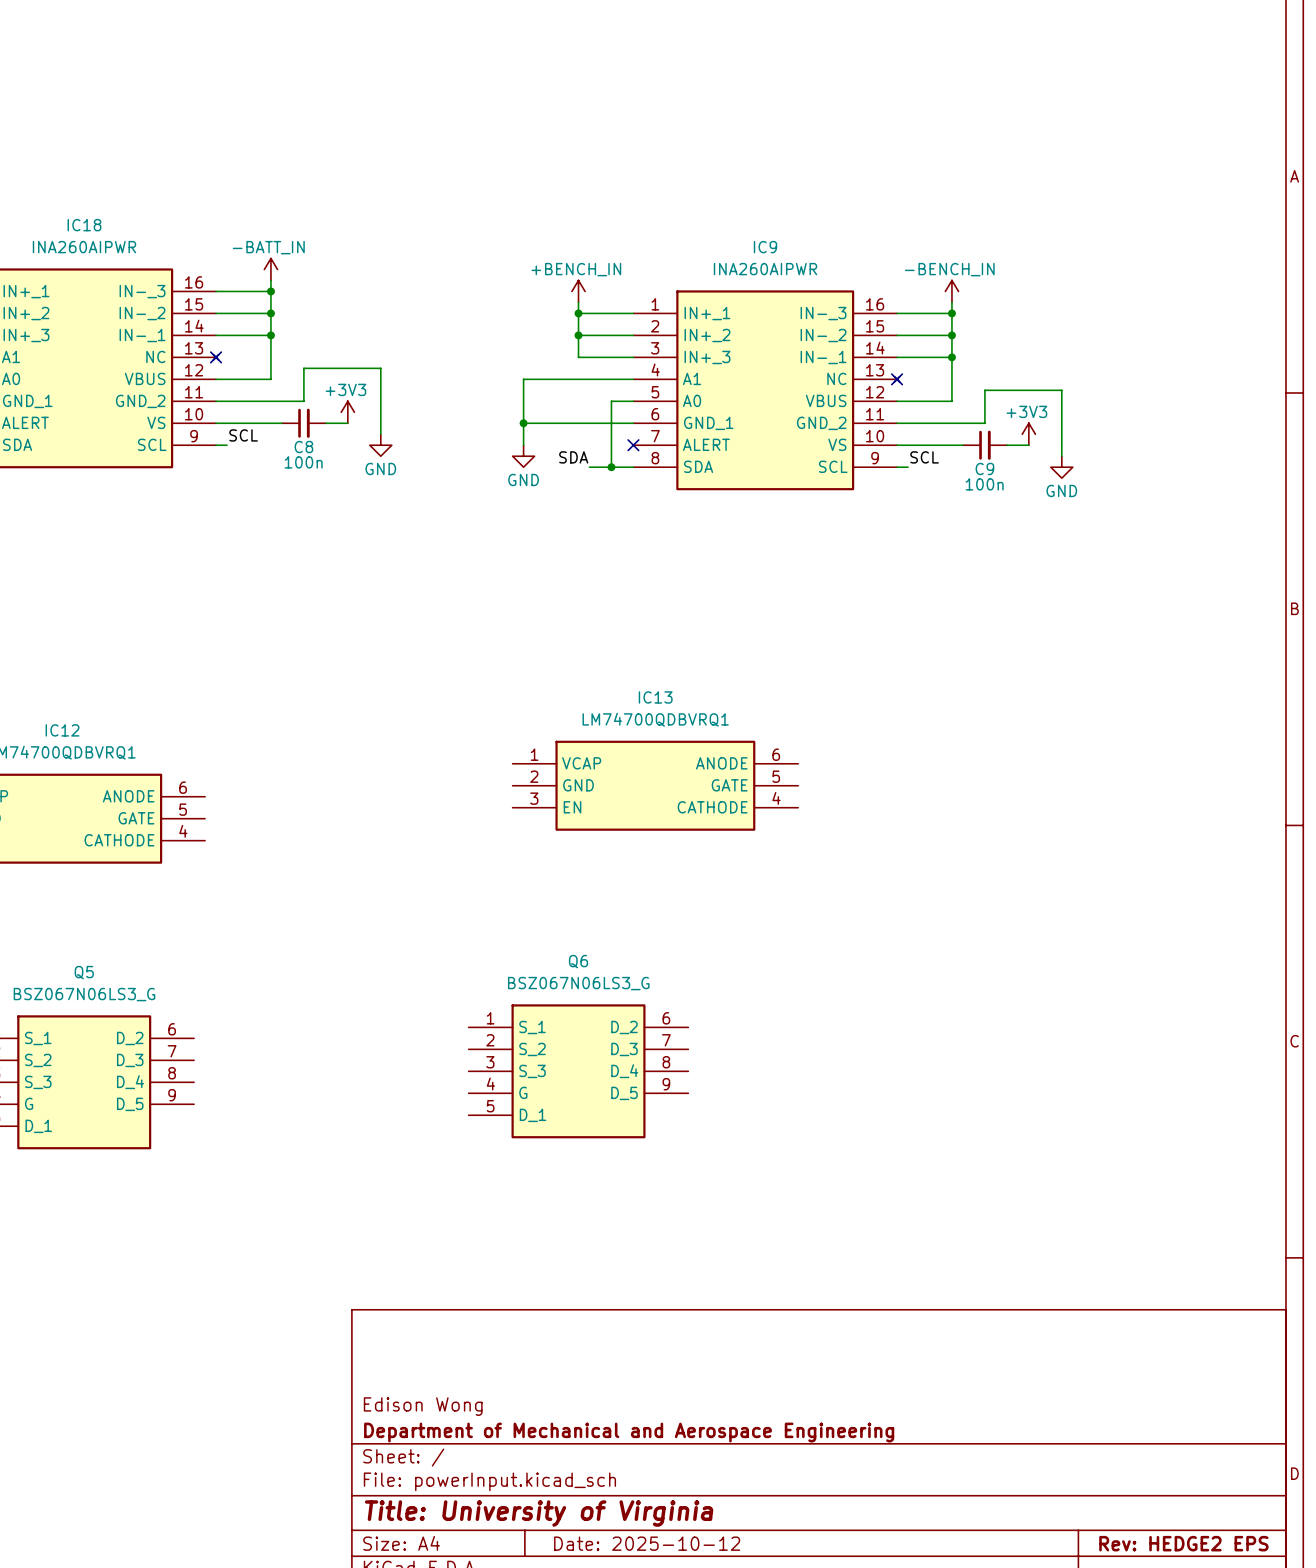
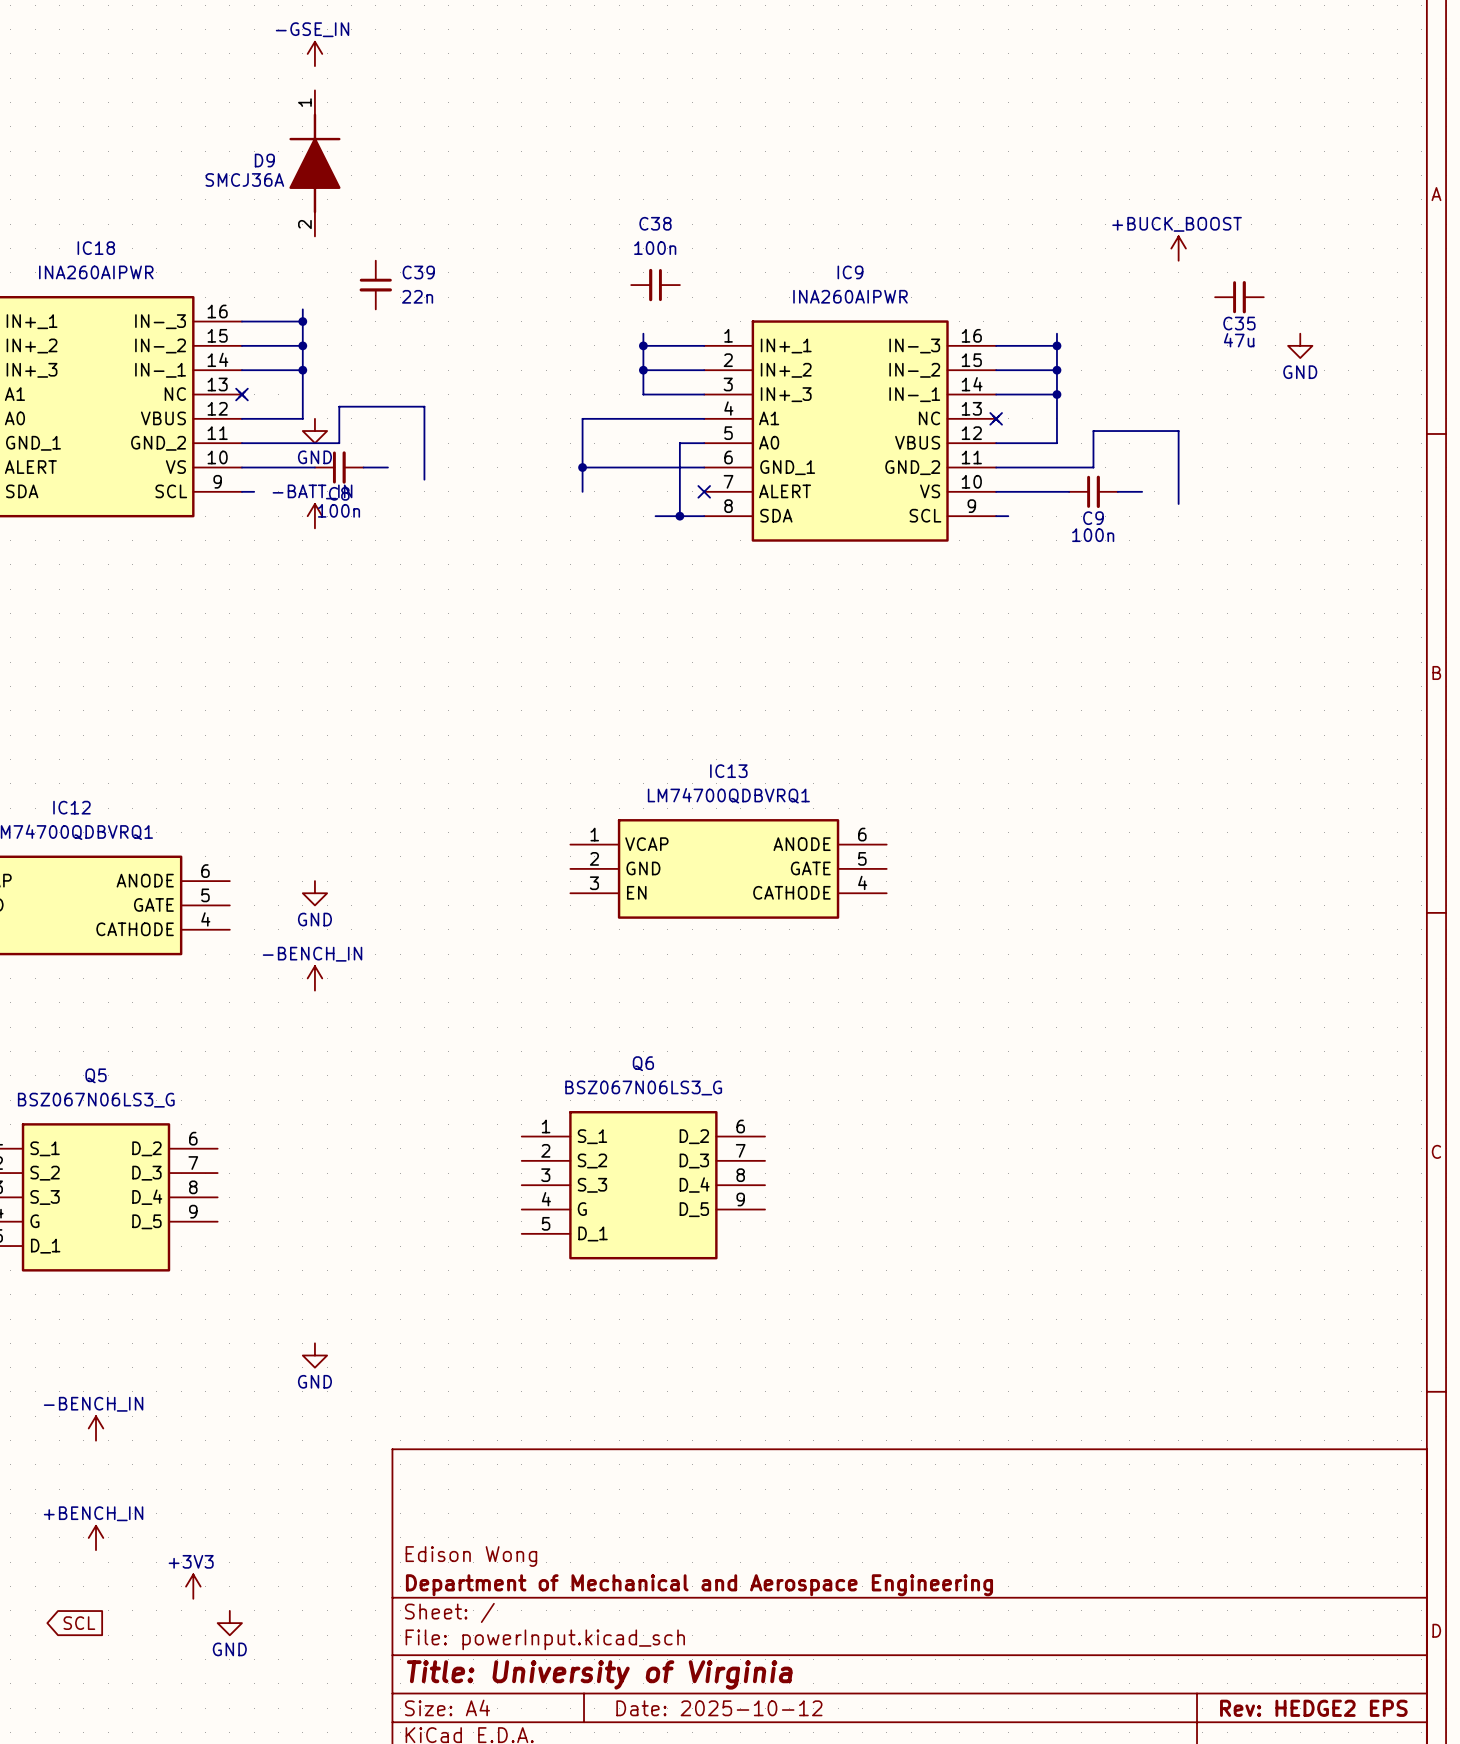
power symbol: none -> -GSE_IN (314, 53)
D9: none -> SMCJ36A (314, 163)
power symbol: none -> +BUCK_BOOST (1178, 248)
C39: none -> 22n (375, 285)
C38: none -> 100n (655, 285)
power symbol position: -BATT_IN (270, 269) -> -BATT_IN (314, 516)
C35: none -> 47u (1239, 297)
power symbol: +BENCH_IN (578, 291) -> none
power symbol: -BENCH_IN (951, 291) -> none
power symbol: +3V3 (347, 412) -> none
power symbol: +3V3 (1028, 434) -> none
label: SCL (243, 435) -> none
power symbol position: GND (380, 445) -> GND (314, 431)
power symbol: GND (523, 456) -> none
label: SDA (573, 457) -> none
label: SCL (924, 457) -> none
power symbol position: GND (1061, 467) -> GND (1300, 345)
power symbol: none -> GND (314, 893)
power symbol: none -> -BENCH_IN (314, 978)
power symbol: none -> GND (314, 1355)
power symbol: none -> -BENCH_IN (96, 1428)
power symbol: none -> +BENCH_IN (96, 1537)
power symbol: none -> +3V3 (193, 1586)
global label: none -> SCL (79, 1623)
power symbol: none -> GND (229, 1623)

